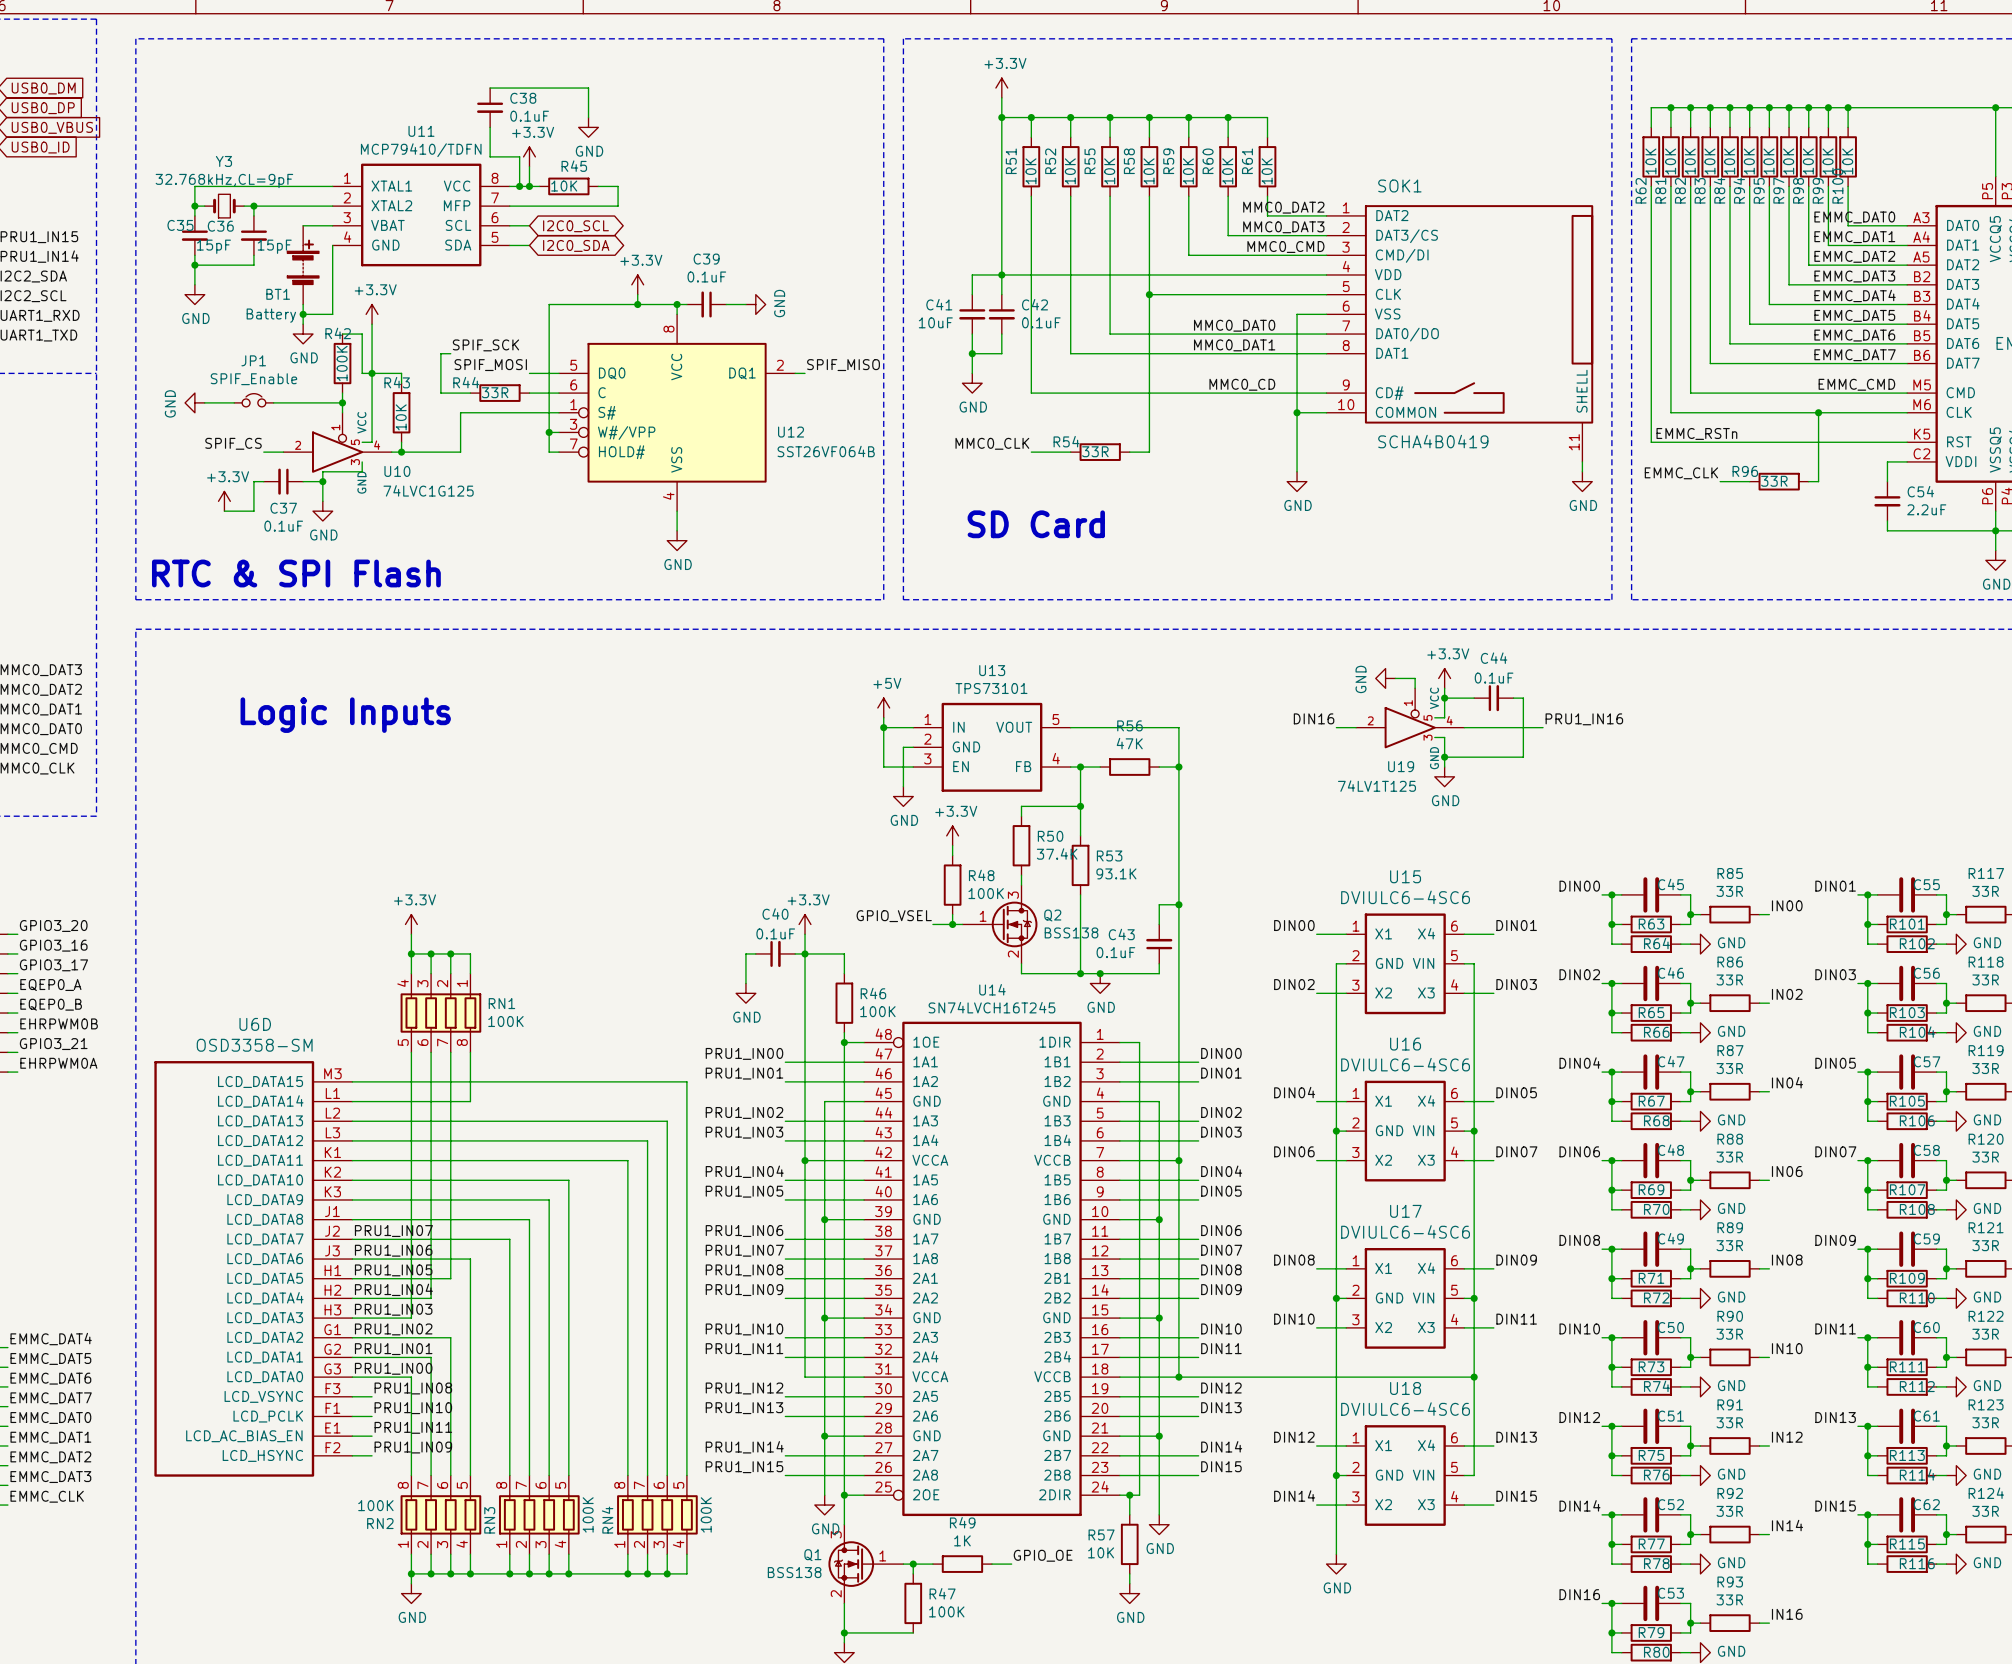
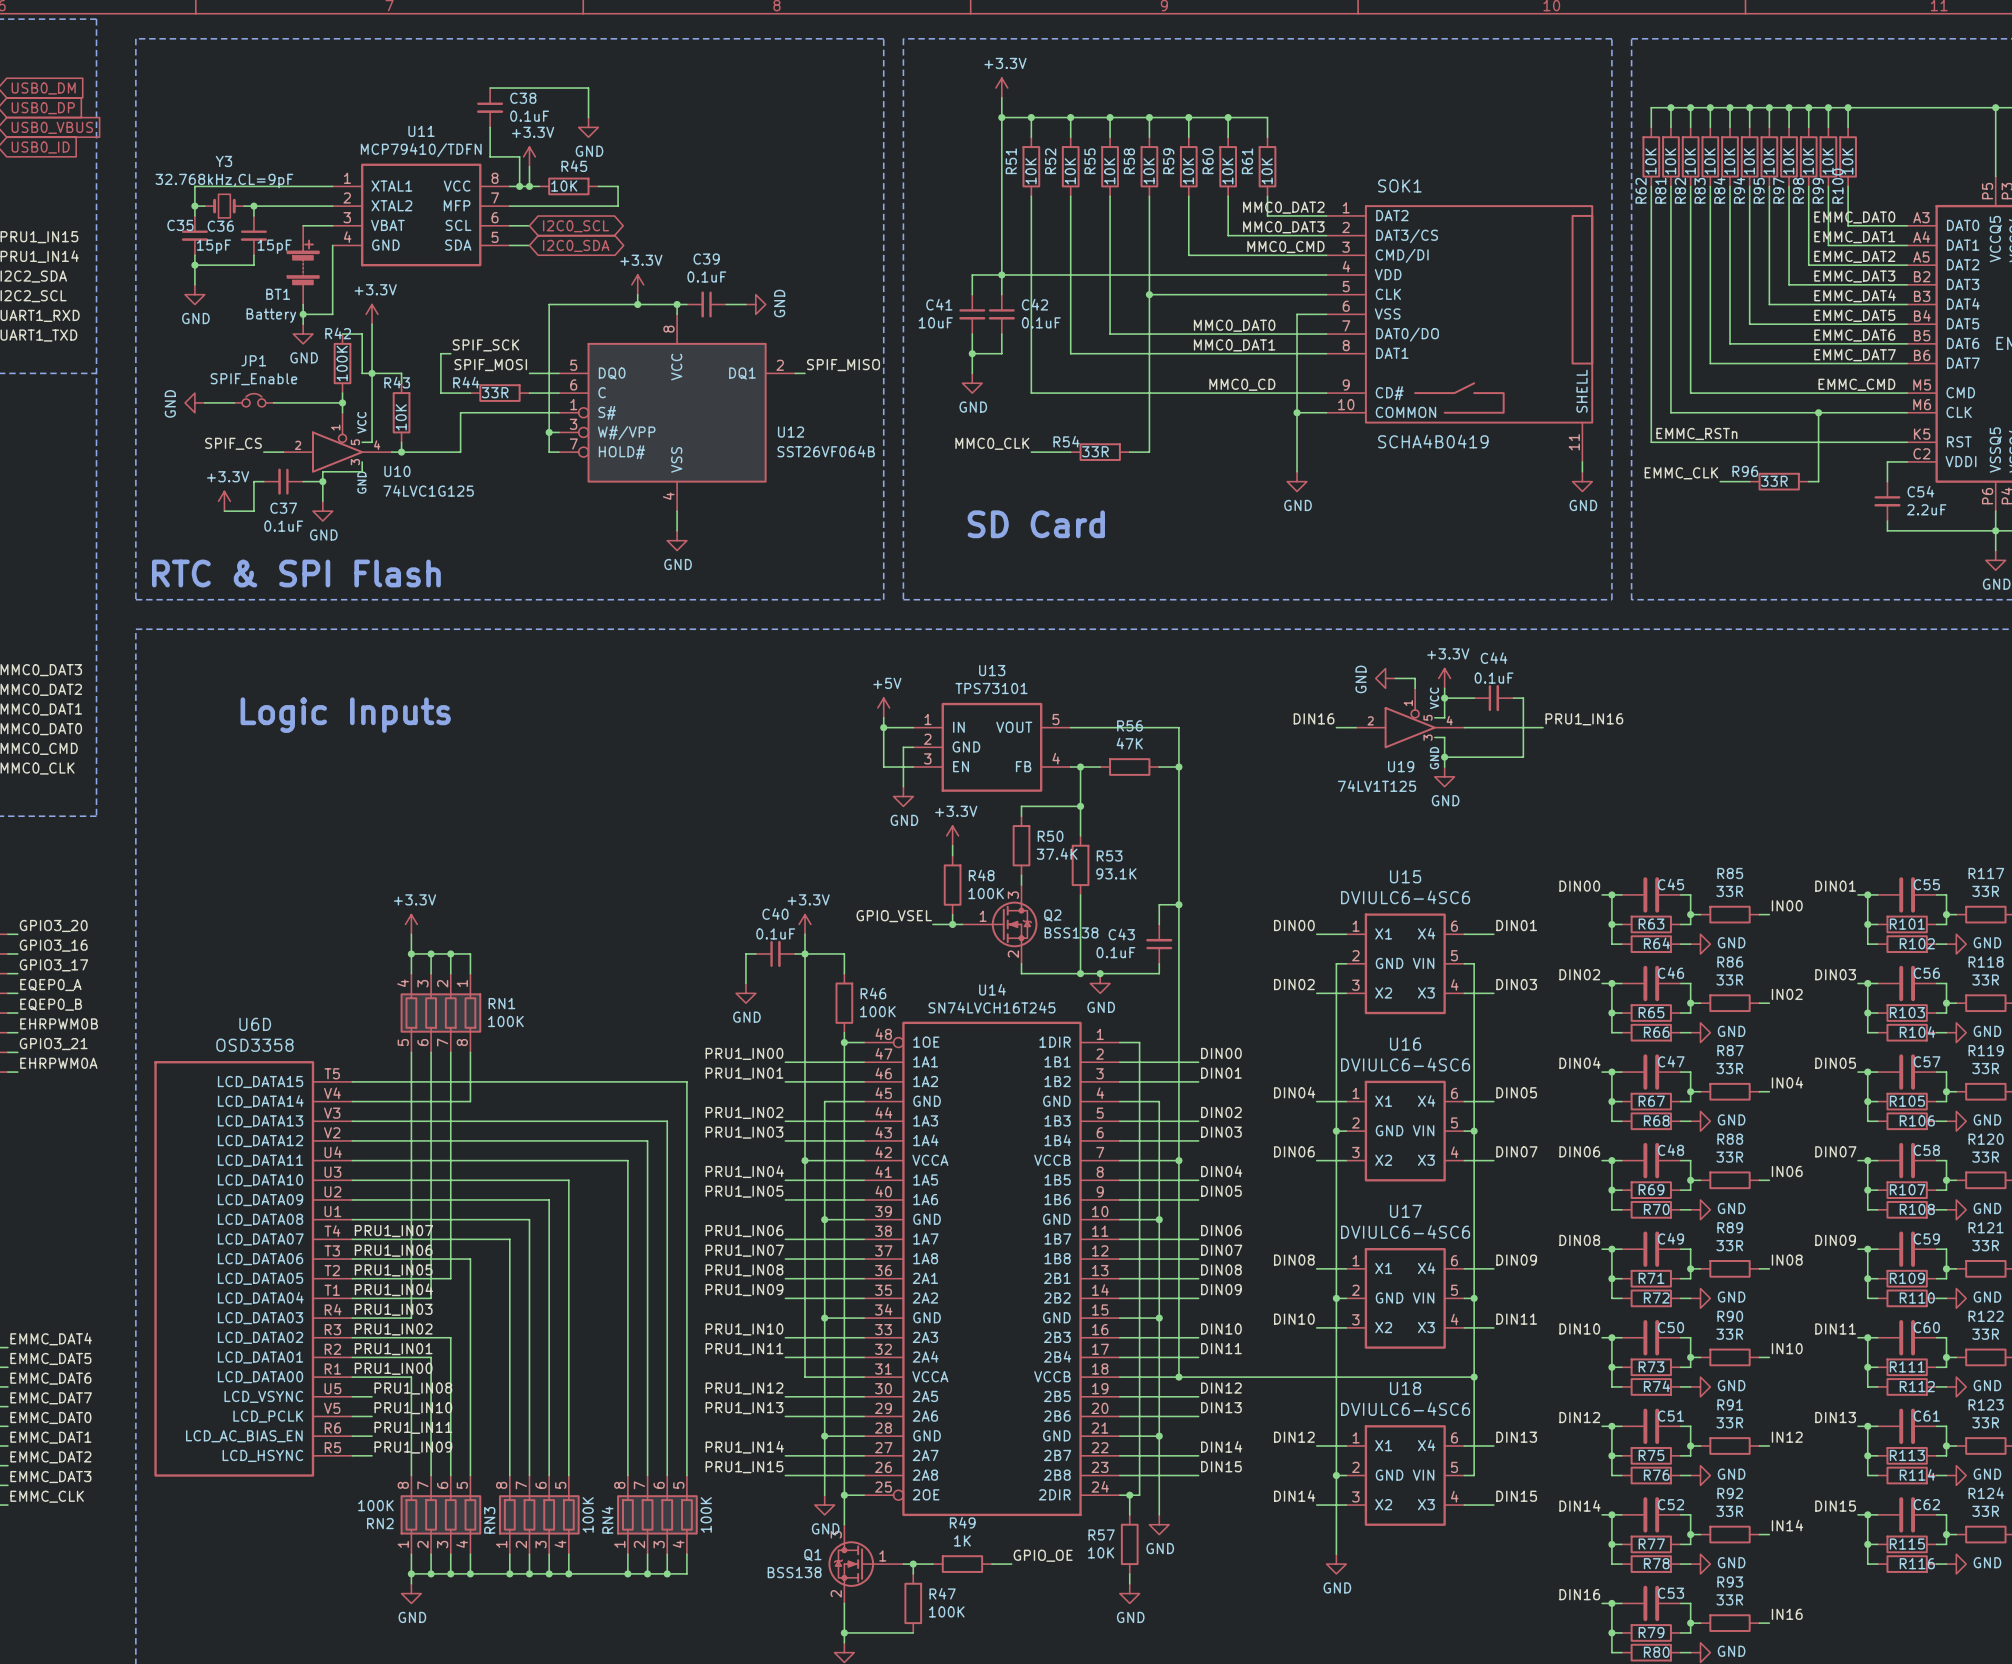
U6D value: OSD3358-SM (254, 1045) -> OSD3358 (254, 1045)
U6D symbol: [154, 1061, 353, 1477] -> [154, 1061, 353, 1477]

